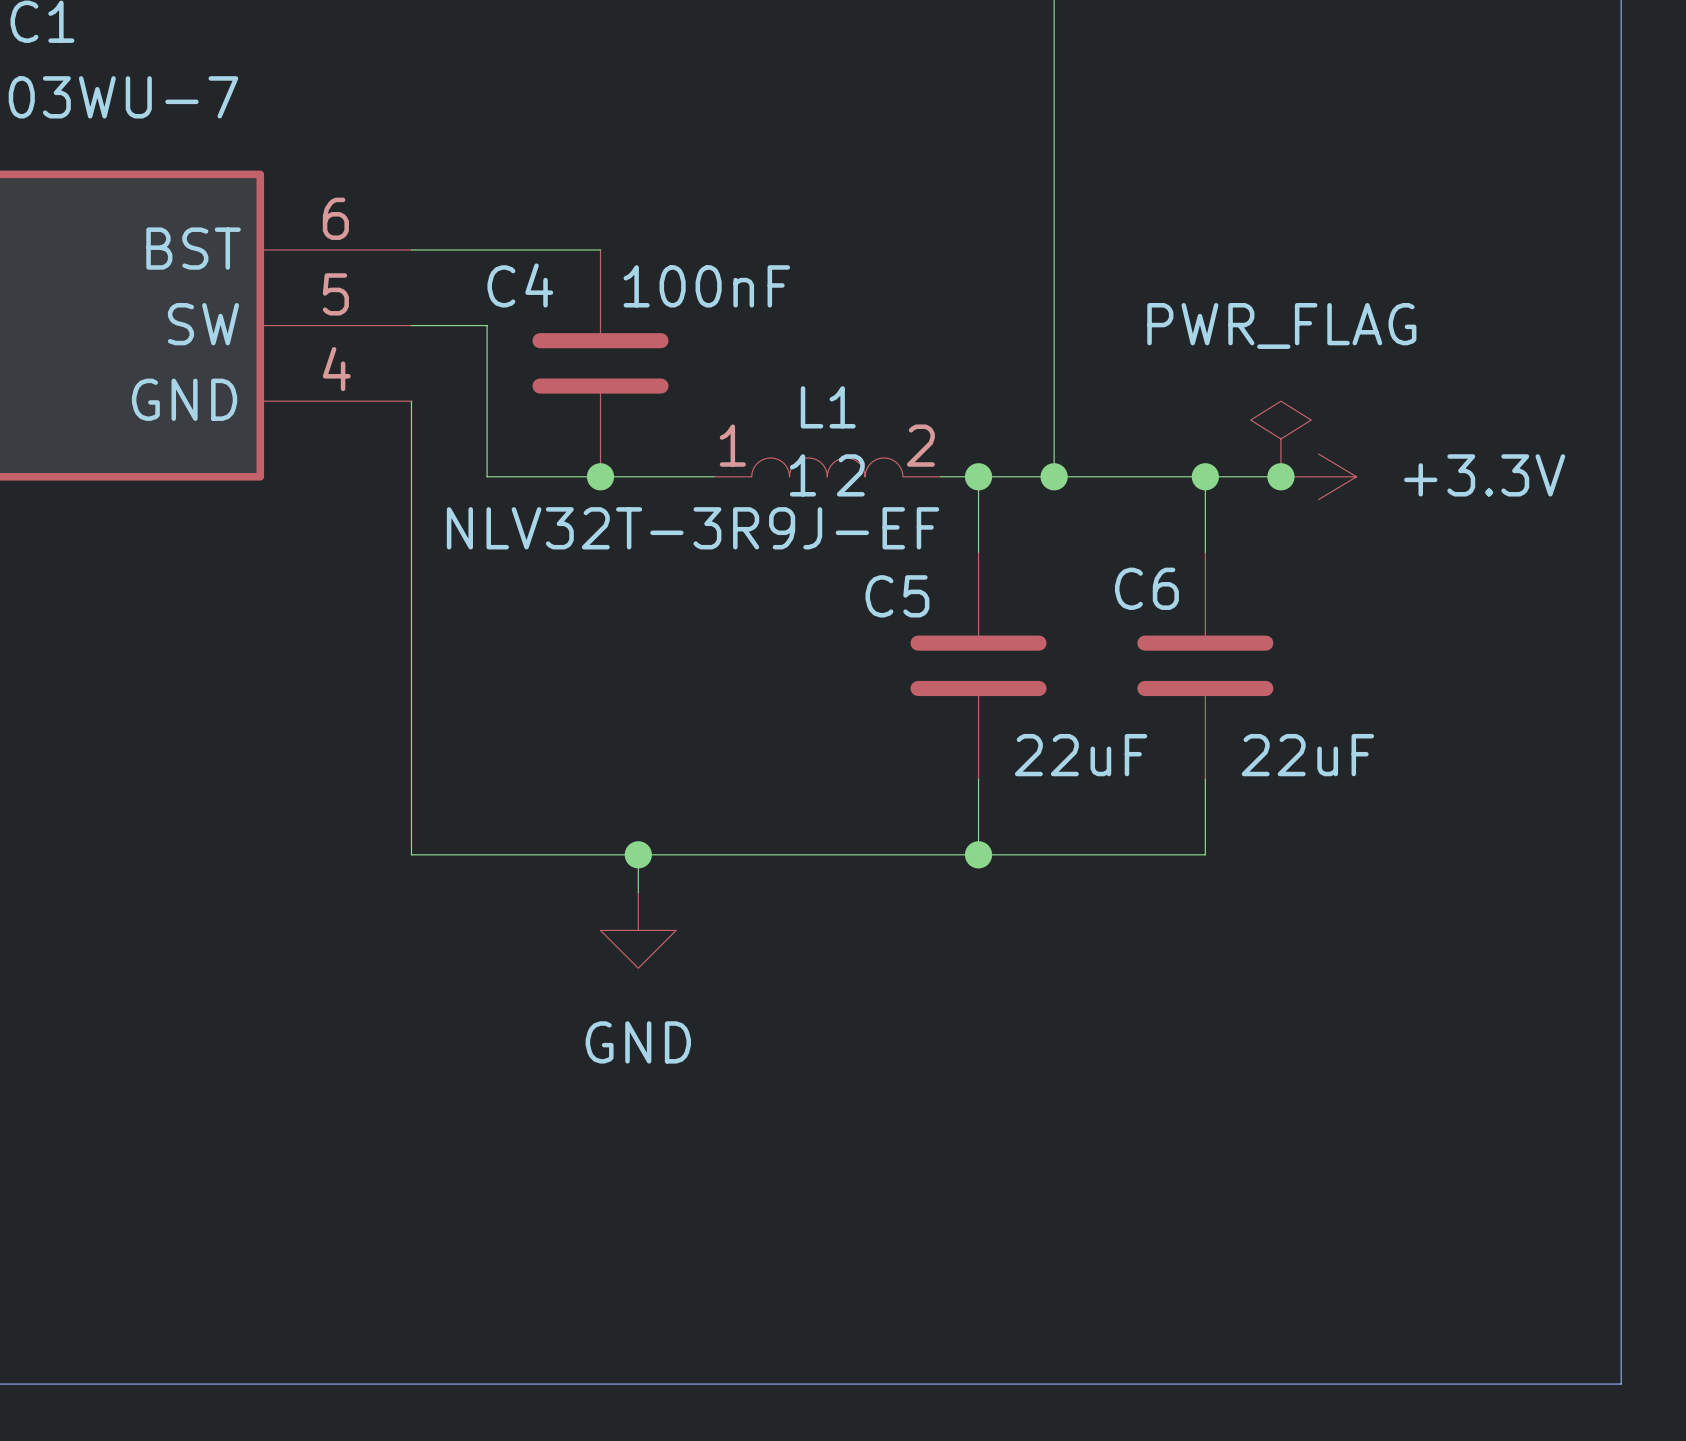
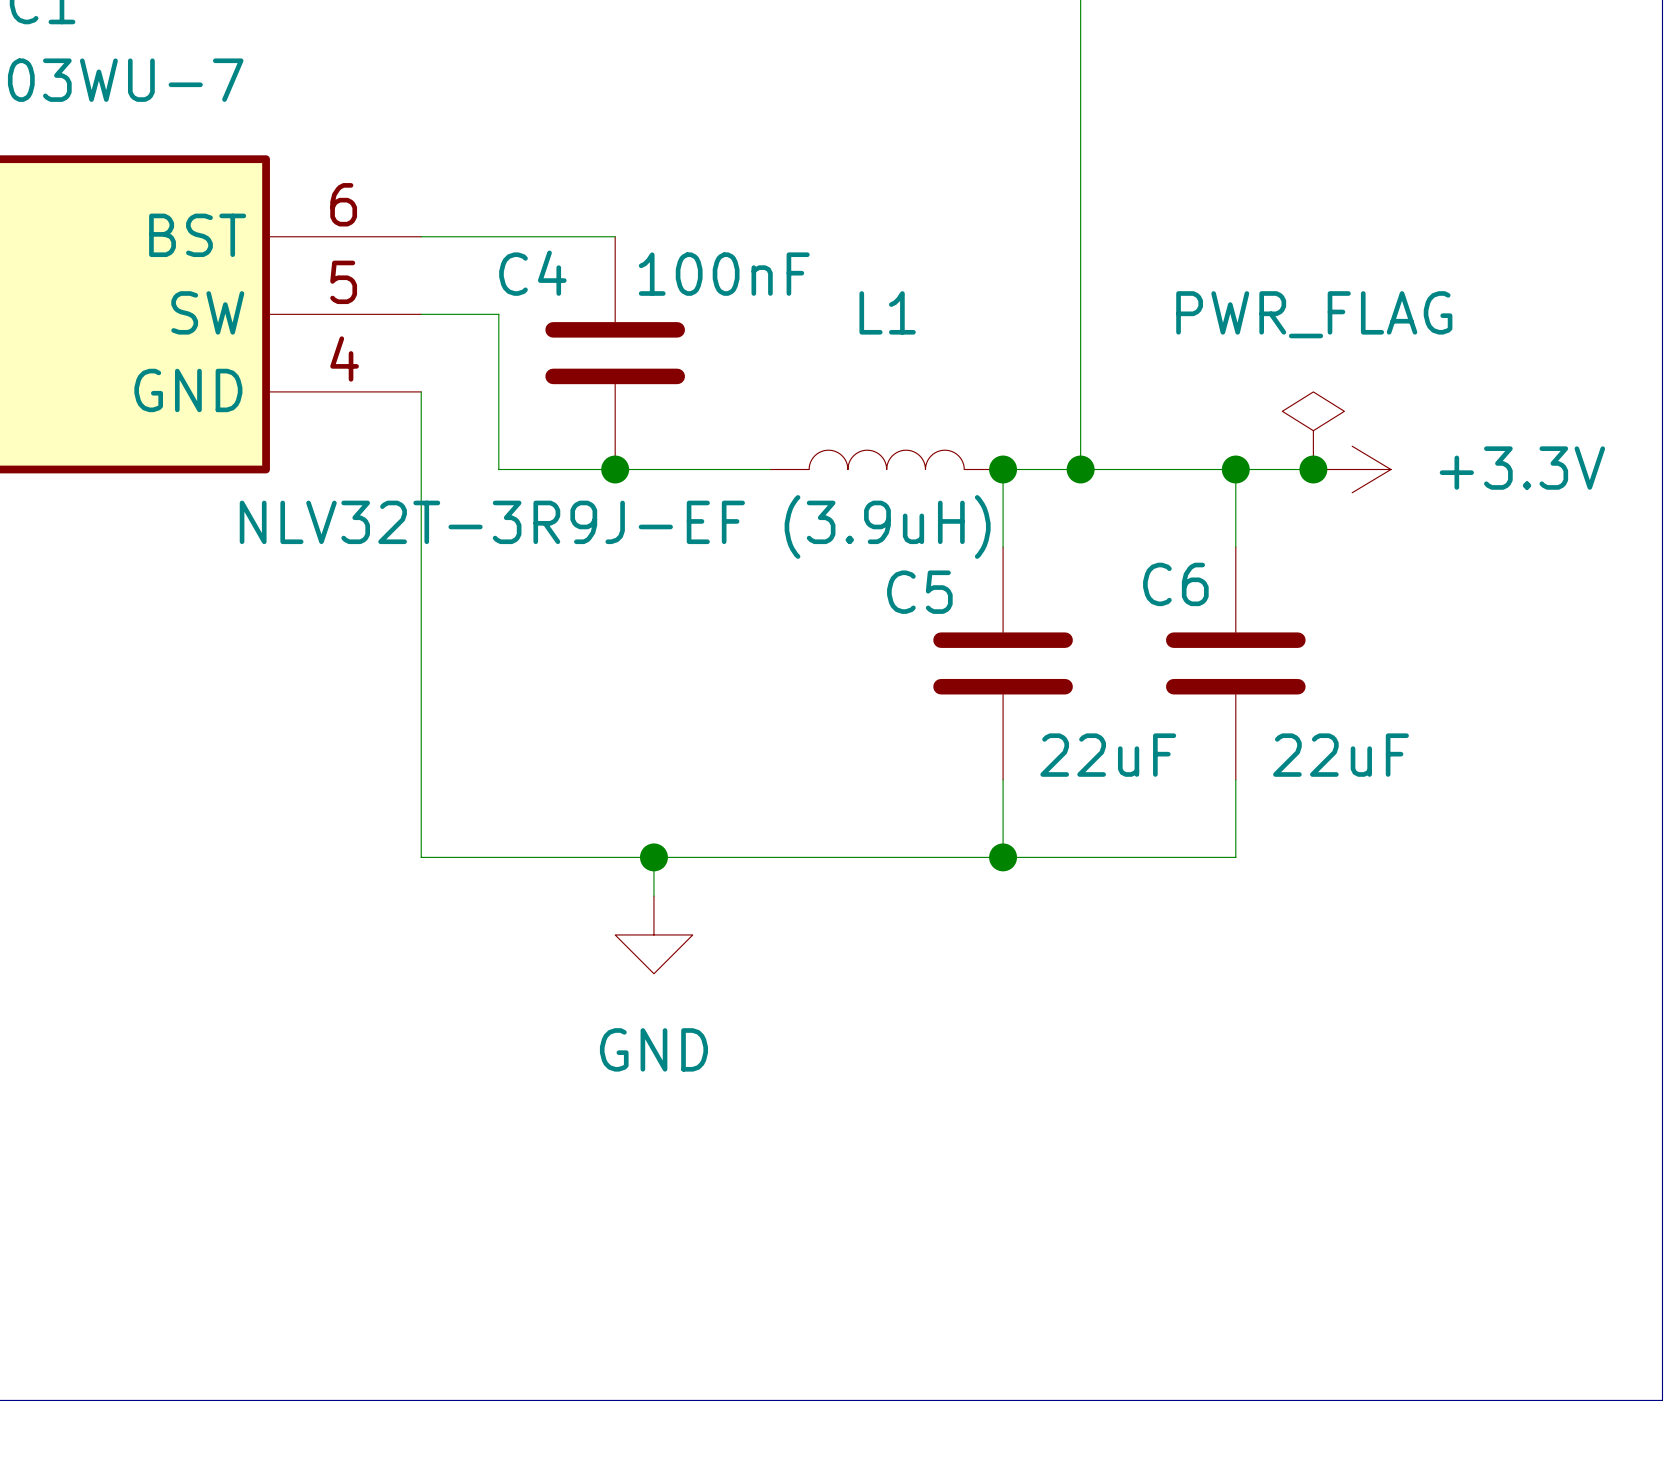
L1 name position: L1 (828, 407) -> L1 (887, 312)
L1 pin number: 1 (732, 445) -> none
L1 pin number: 2 (920, 445) -> none
L1 position: (827, 467) -> (886, 459)
L1 pin name: 1 (802, 475) -> none
L1 pin name: 2 (850, 475) -> none
L1 value: NLV32T-3R9J-EF (693, 528) -> NLV32T-3R9J-EF (3.9uH) (615, 526)

